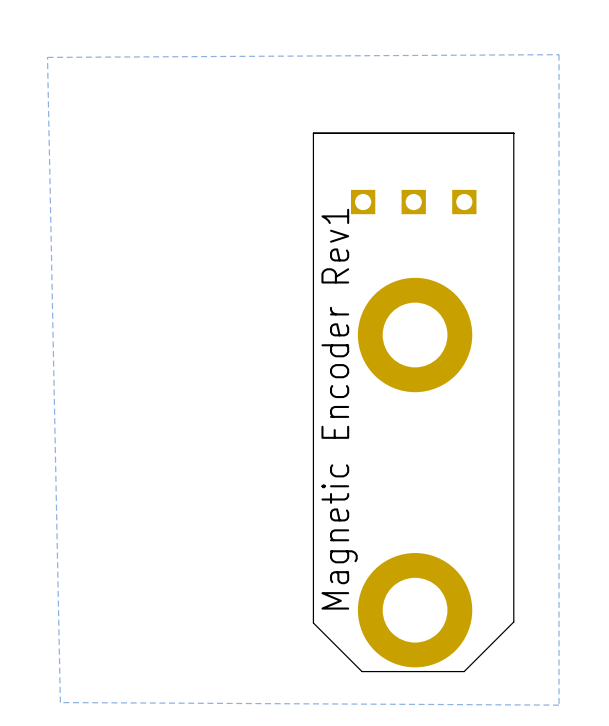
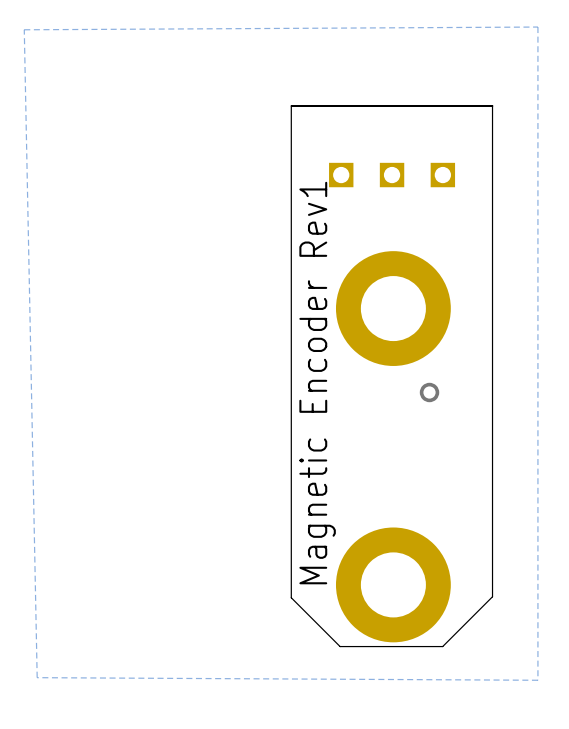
via: none -> (429, 392)

